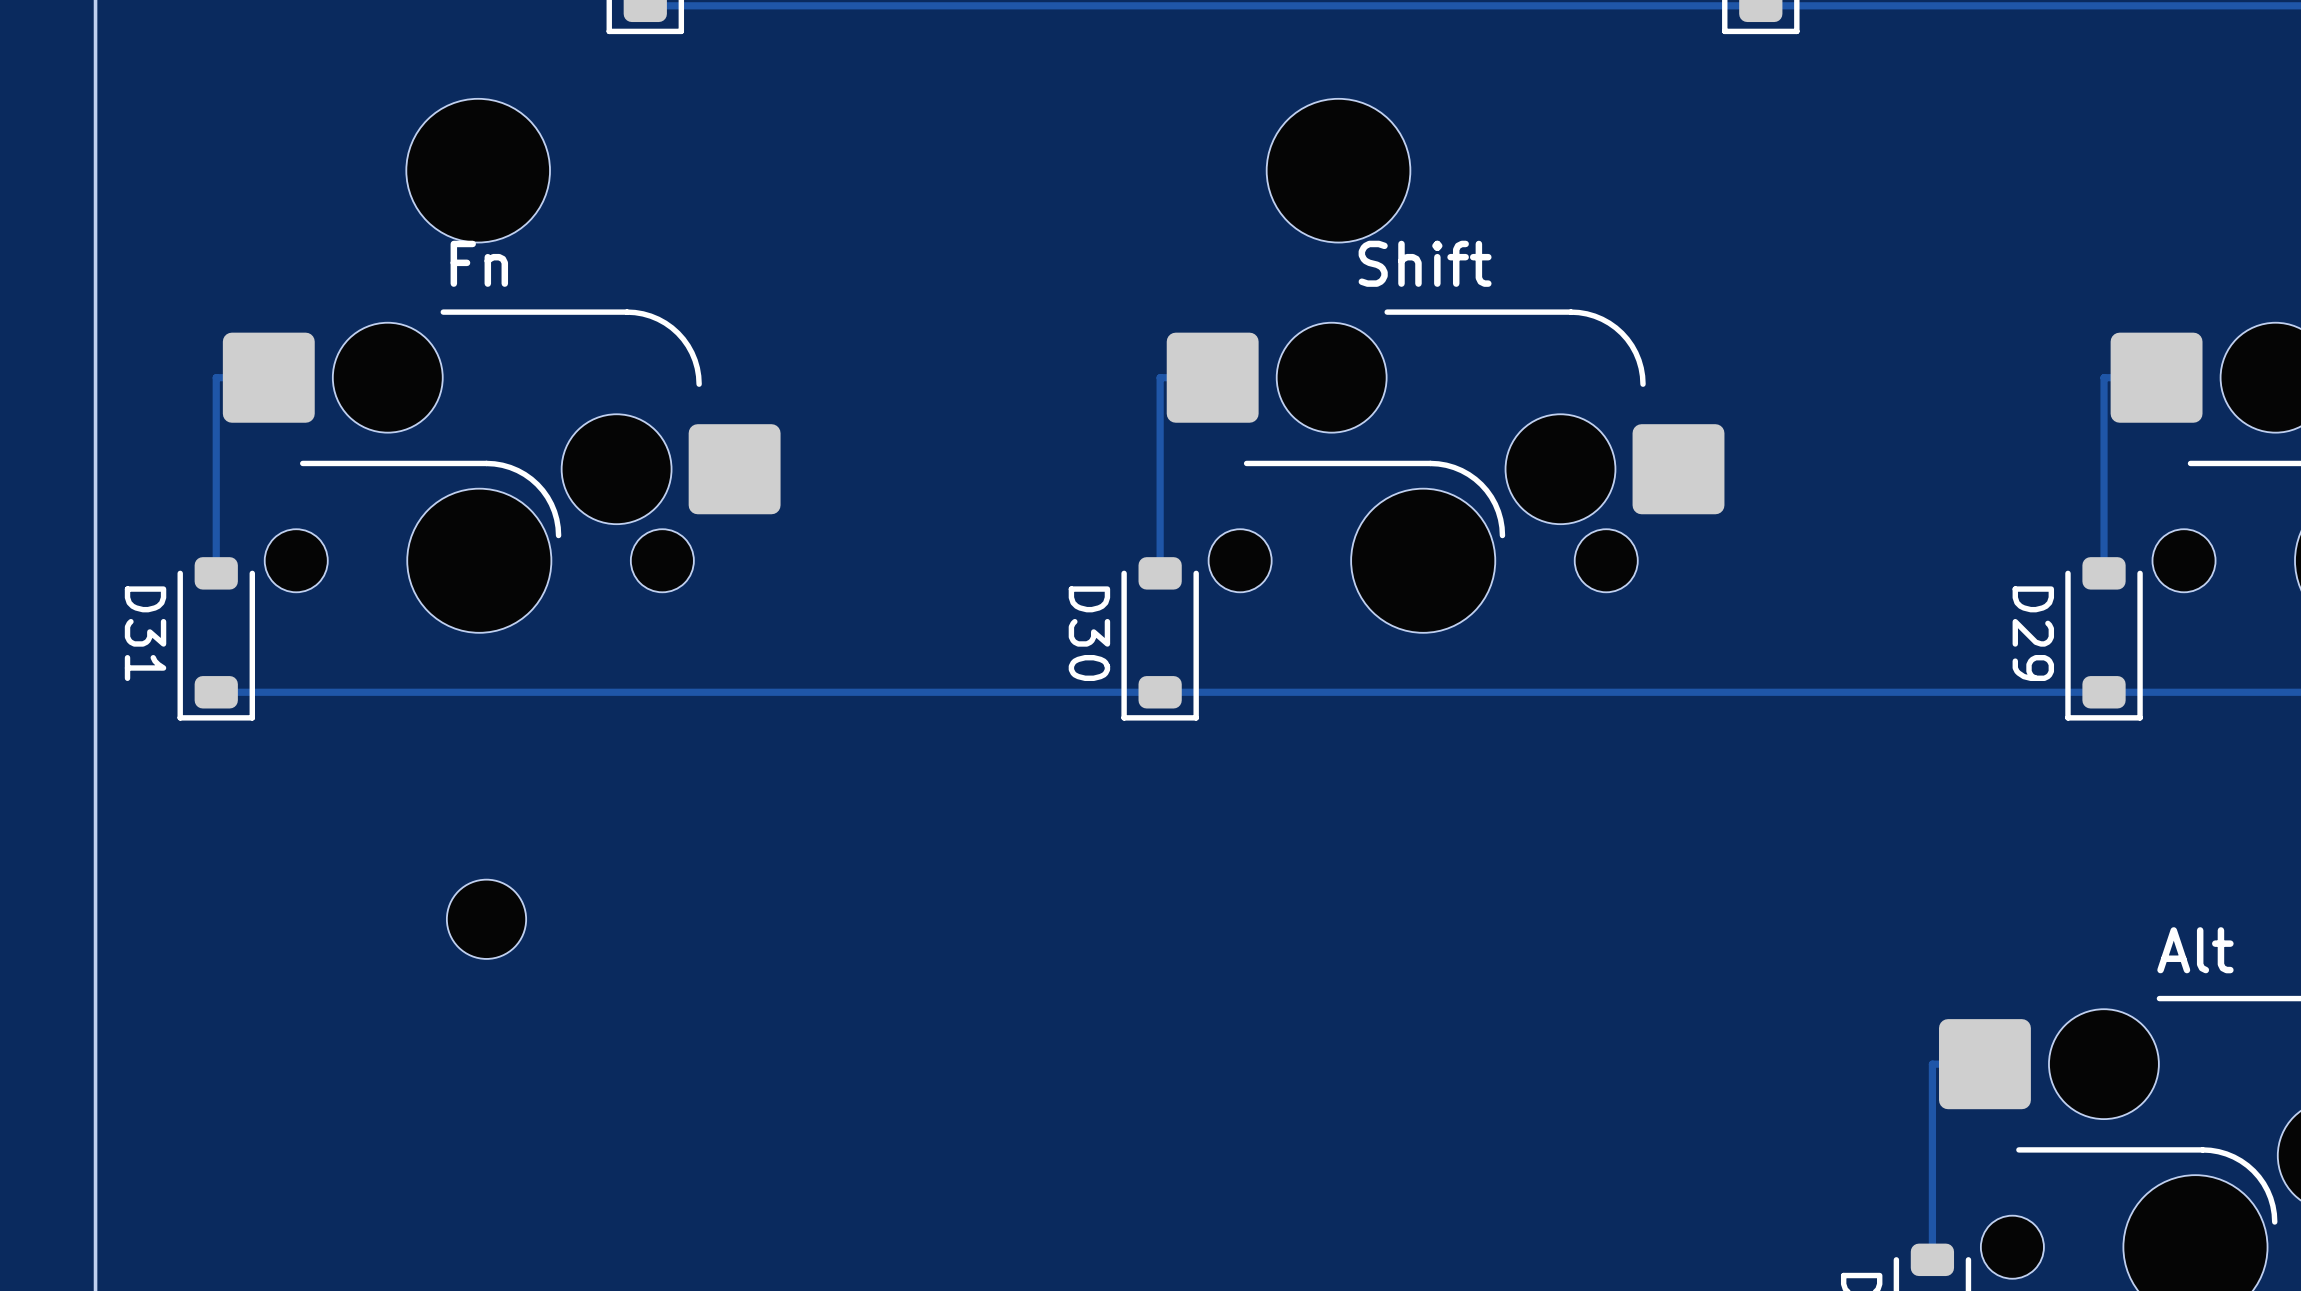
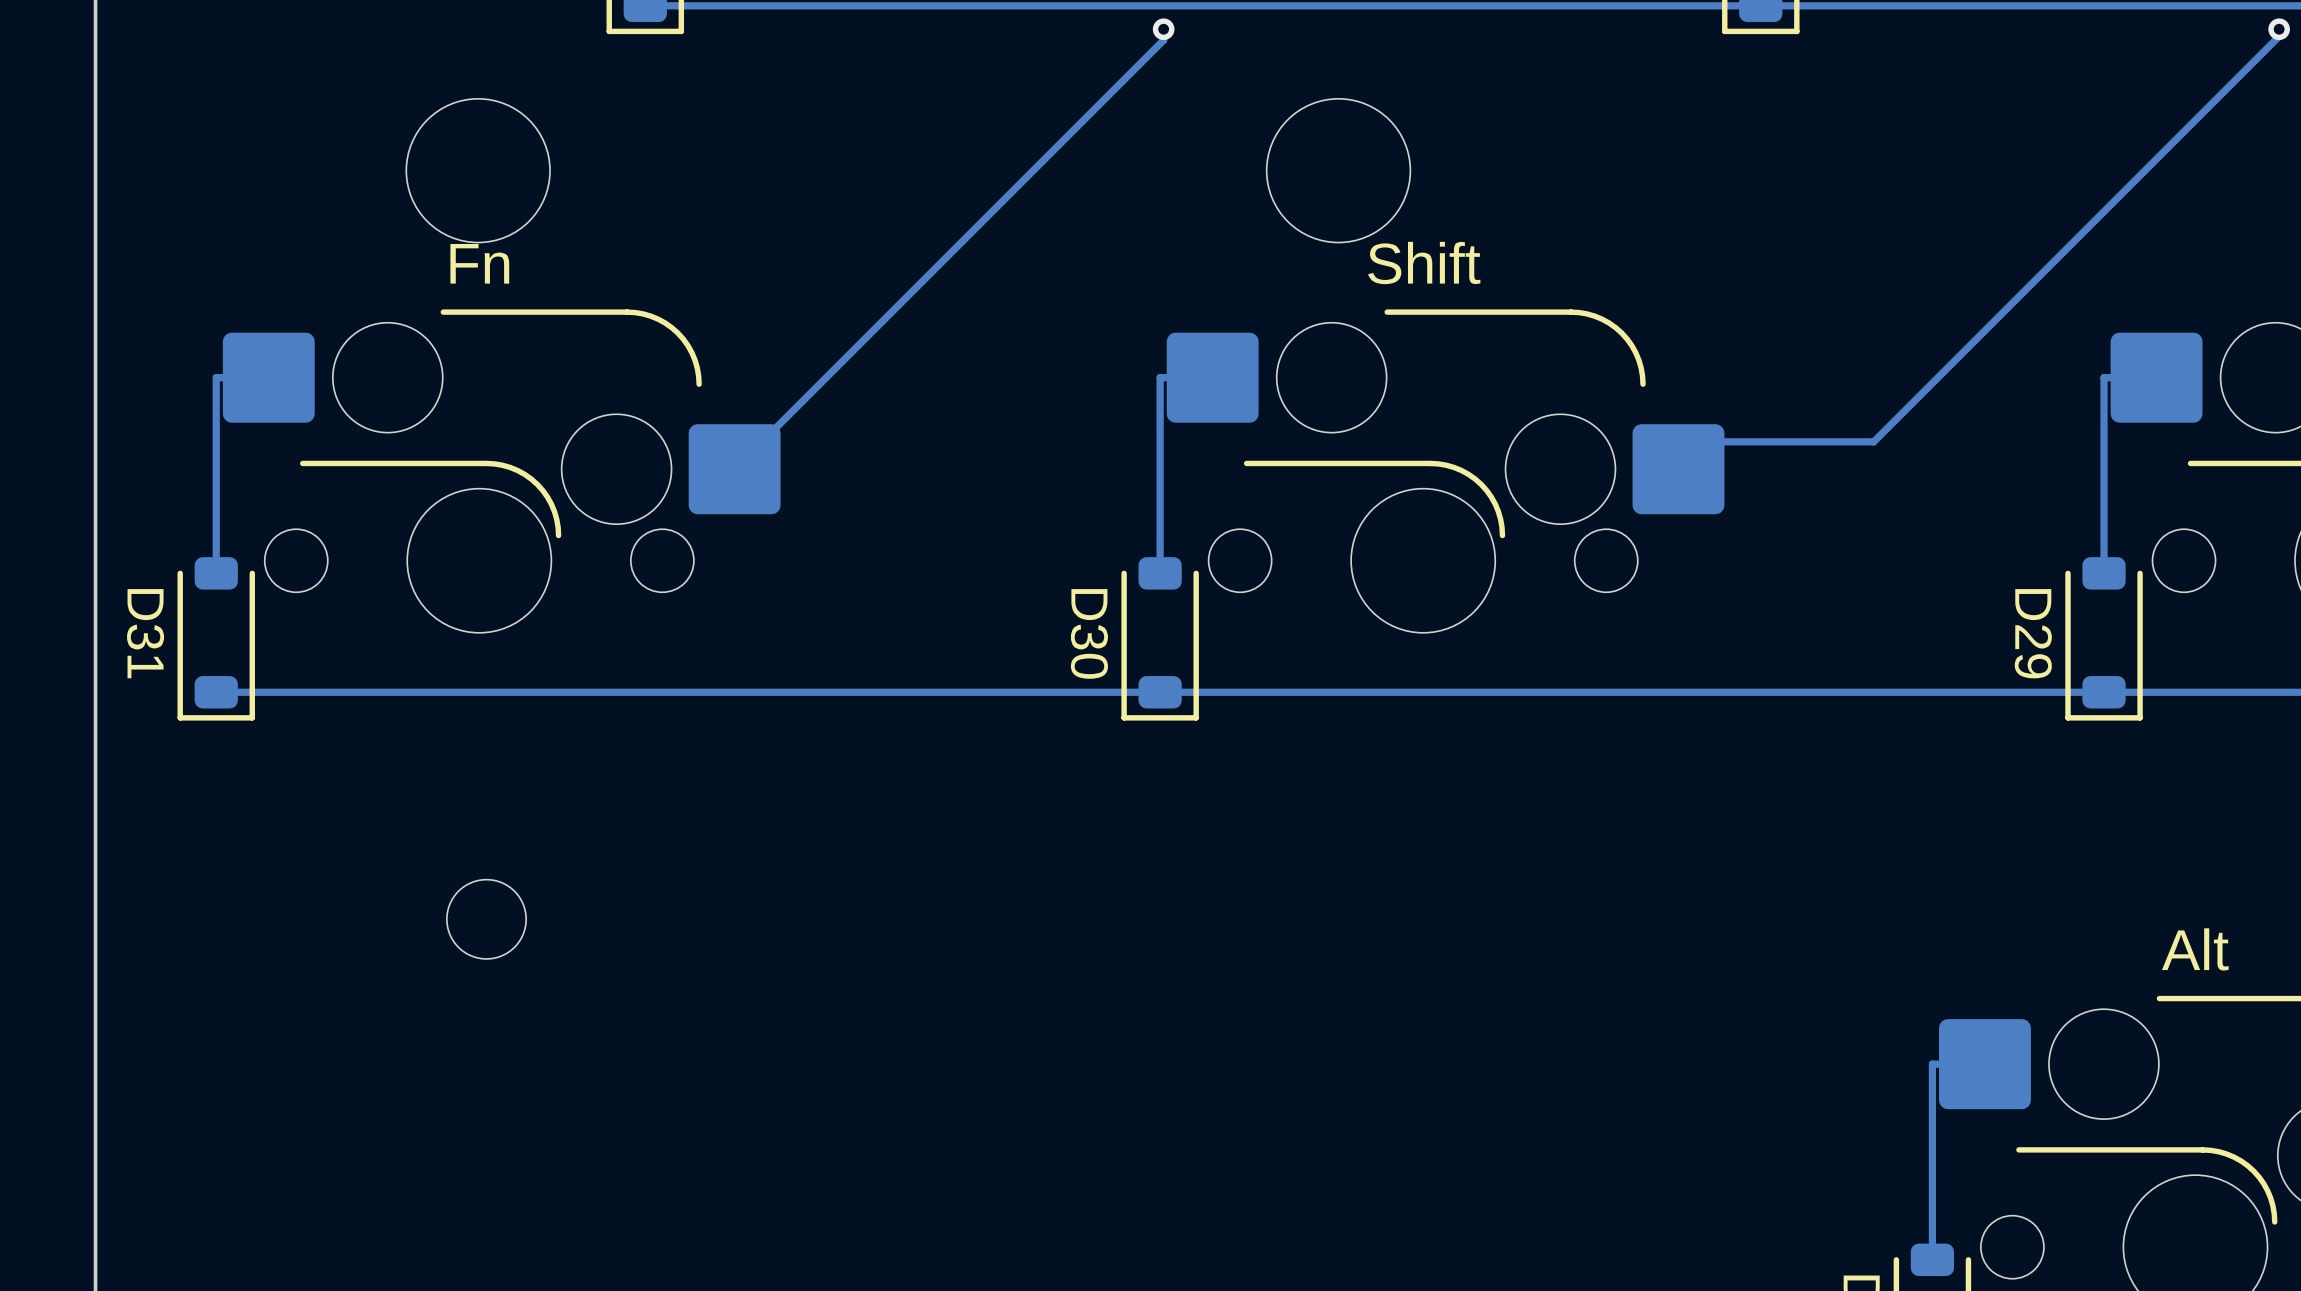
track: none -> (1163, 29) (1163, 40) (734, 469)
via: none -> (1163, 29)
track: none -> (2279, 29) (2279, 36) (1873, 441) (1678, 441) (1678, 469)
via: none -> (2279, 29)

